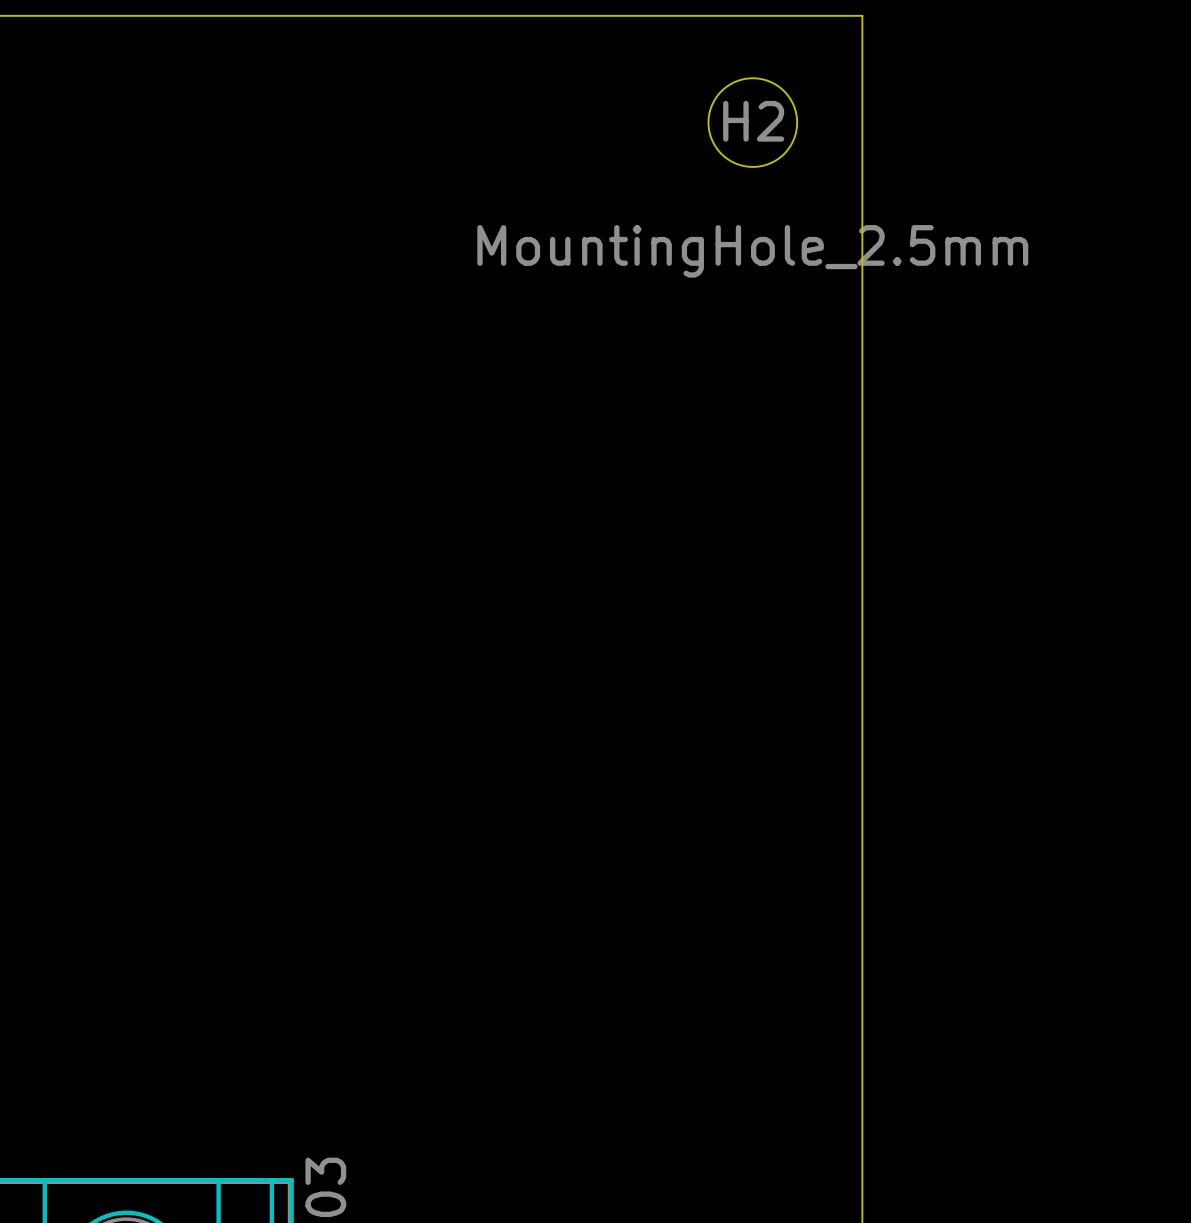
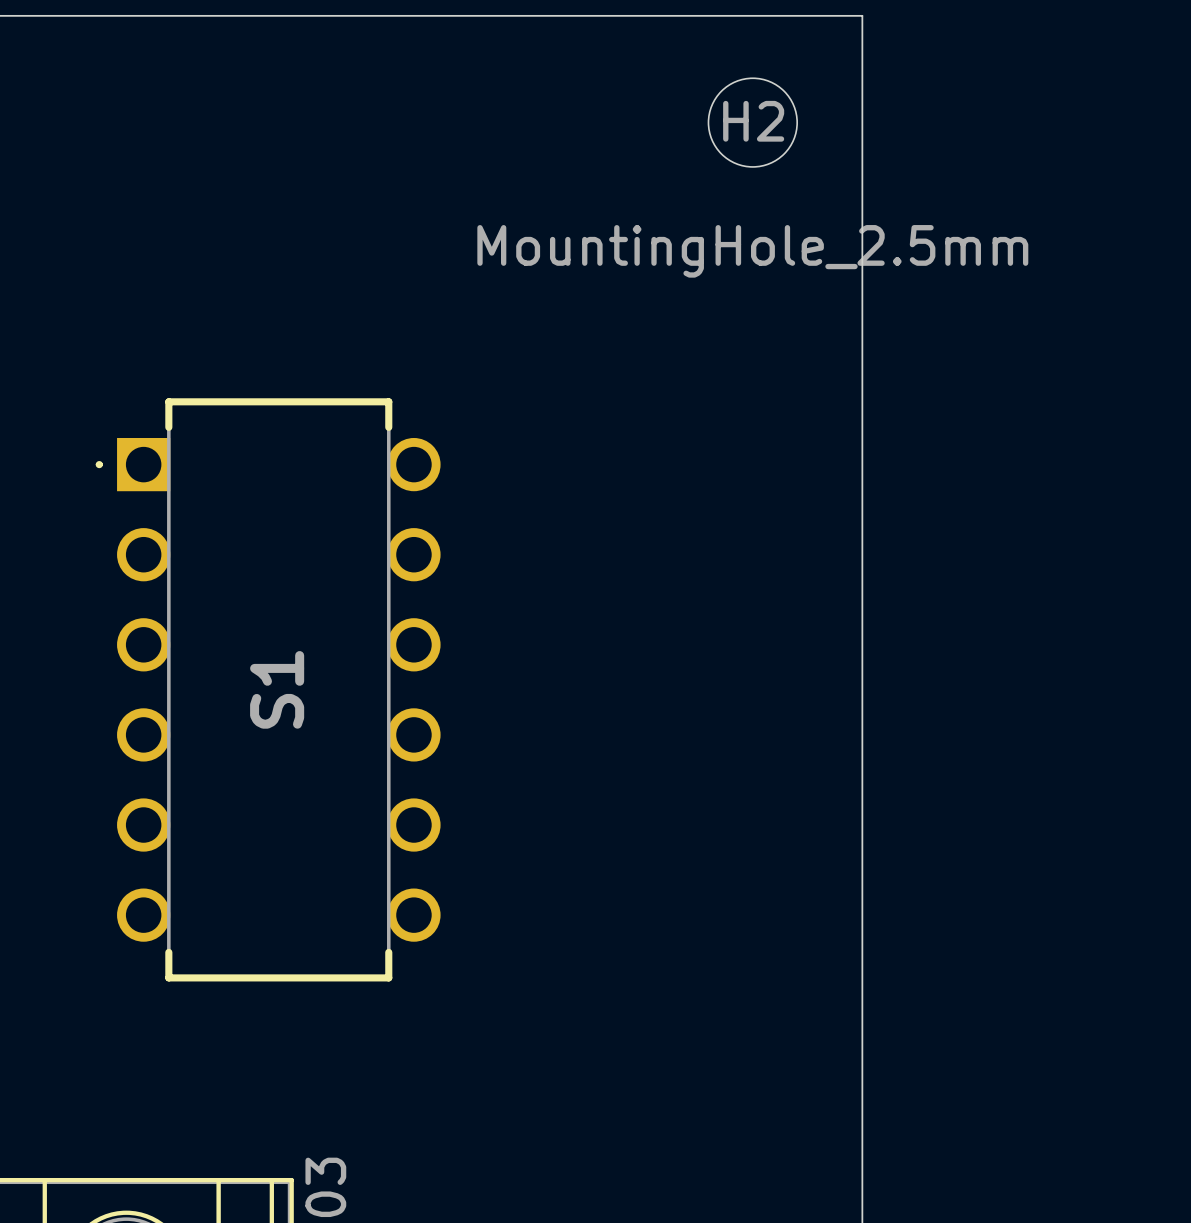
S1: none -> (268, 689)

